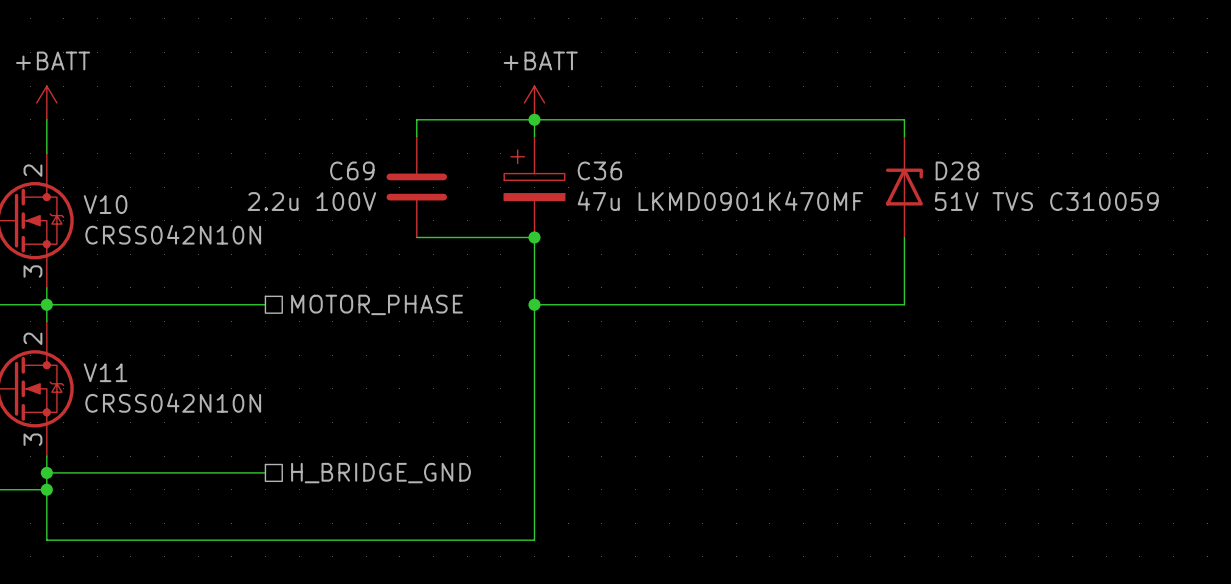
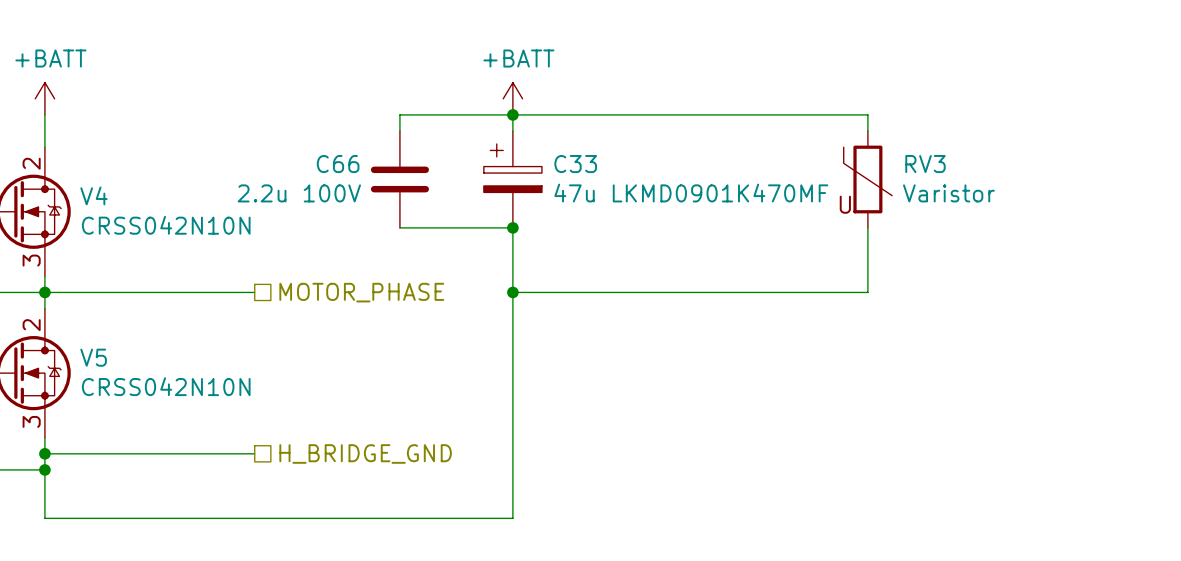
C69 name: C69 (352, 170) -> C66 (338, 164)
C36 name: C36 (599, 170) -> C33 (575, 164)
D28: 51V TVS C310059 (904, 187) -> none
RV3: none -> Varistor (867, 179)
V10 name: V10 (105, 204) -> V4 (93, 195)
V11 name: V11 (105, 372) -> V5 (93, 357)

